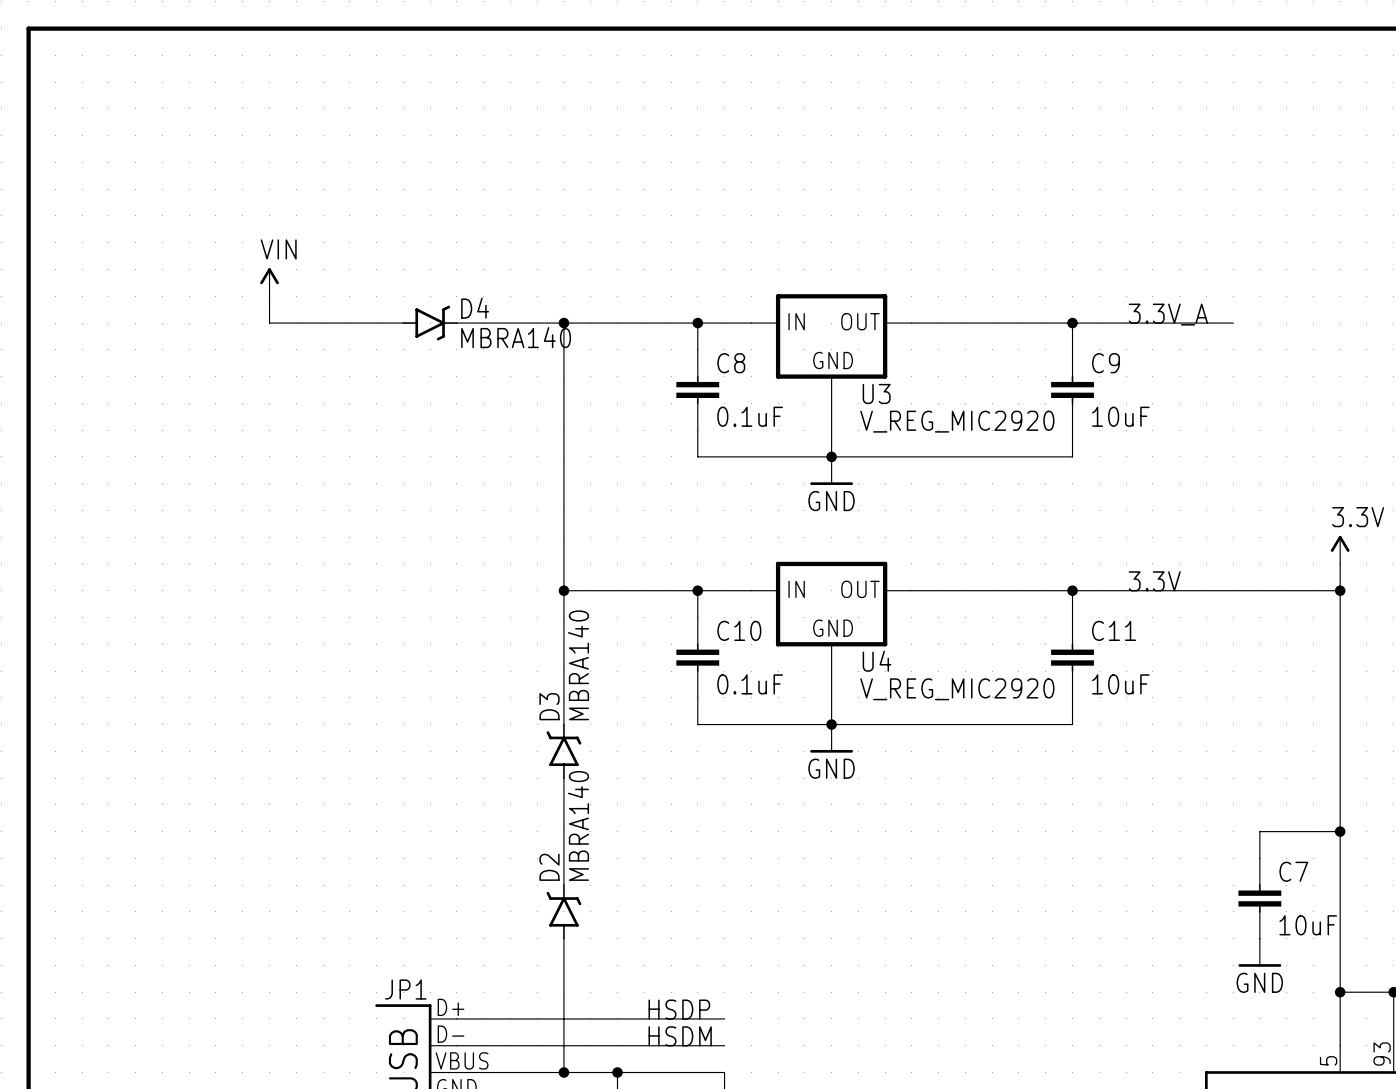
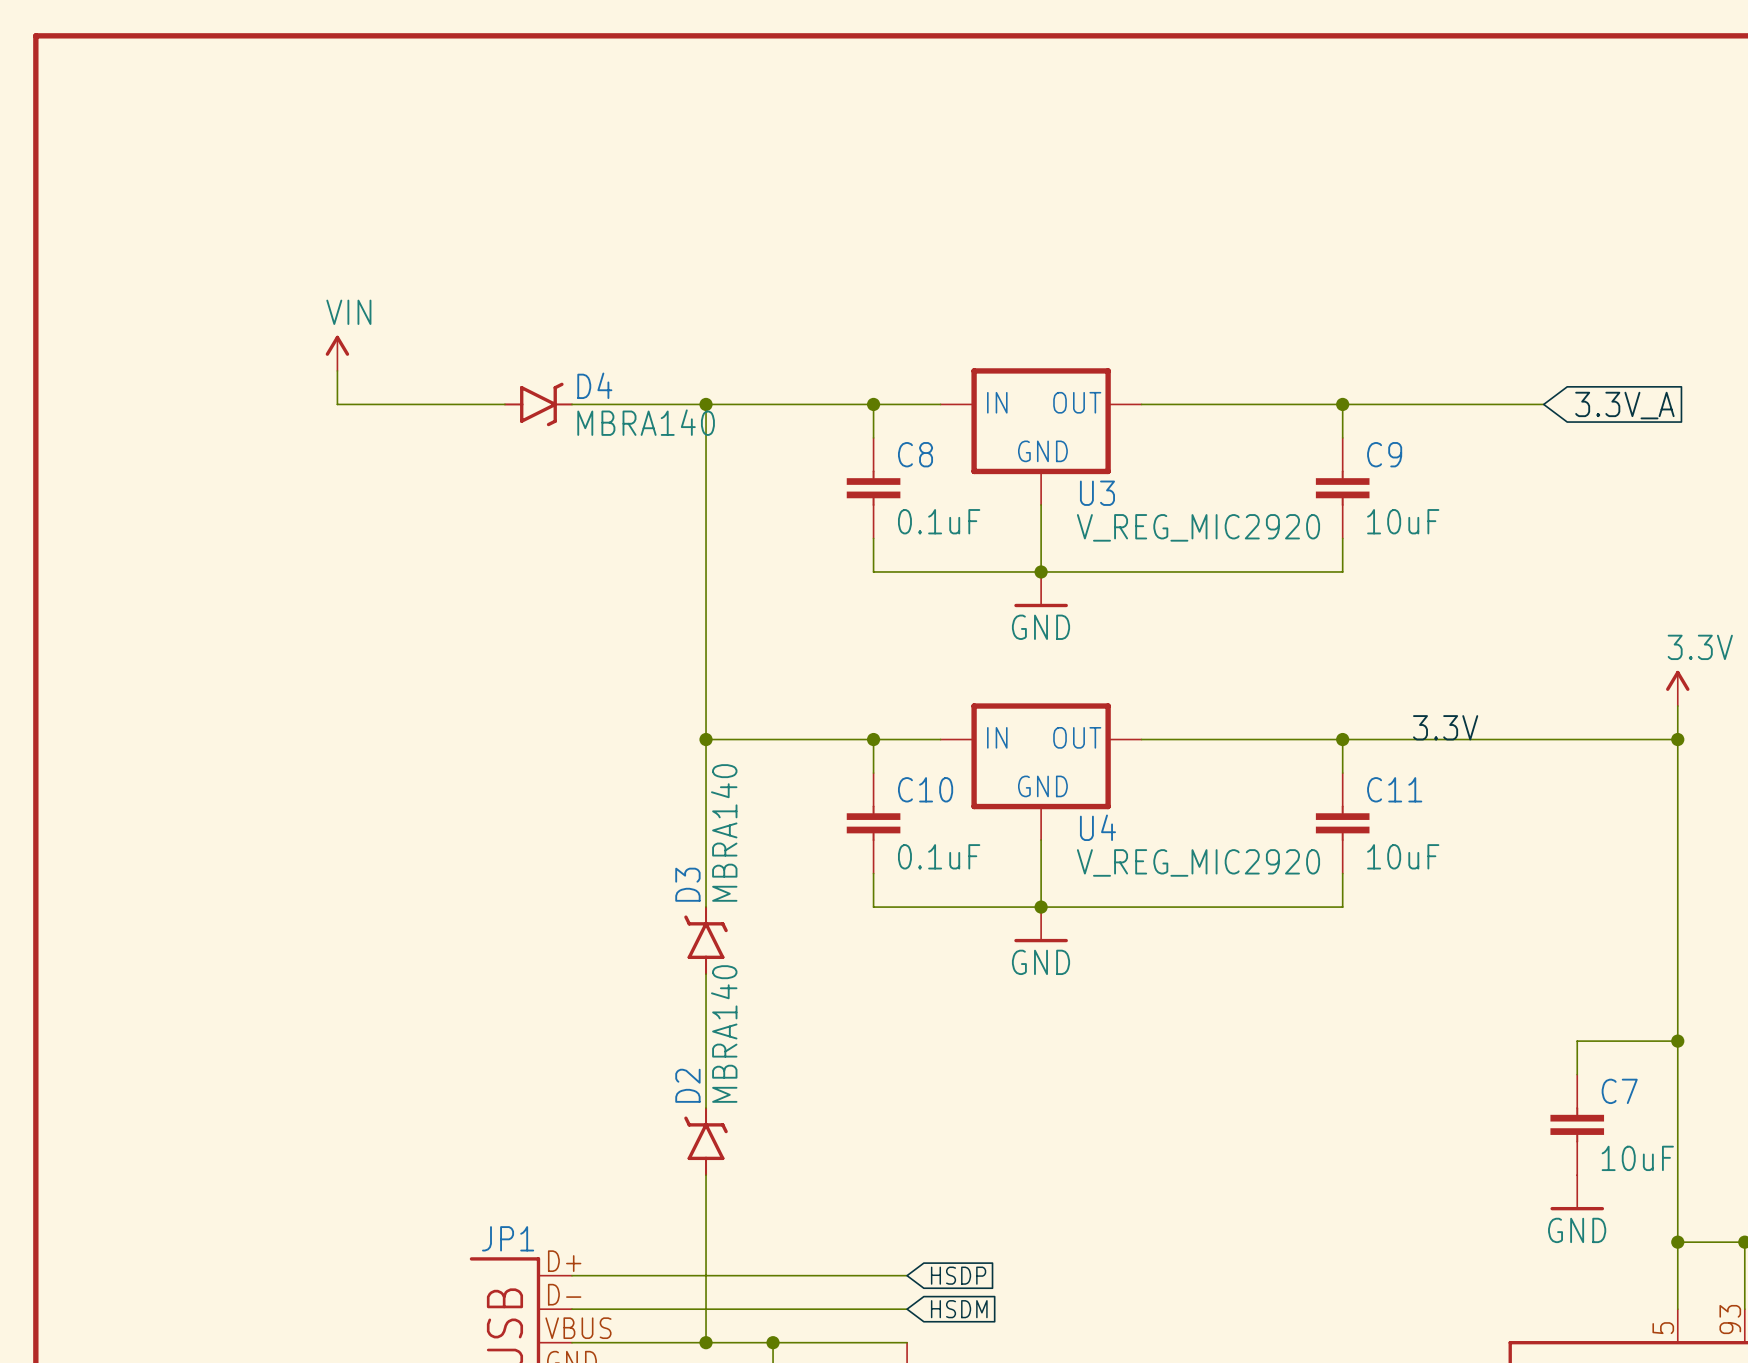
label: 3.3V_A (1168, 314) -> none
global label: none -> 3.3V_A (1624, 405)
label: HSDP (679, 1009) -> none
global label: none -> HSDP (958, 1275)
label: HSDM (680, 1036) -> none
global label: none -> HSDM (959, 1309)

